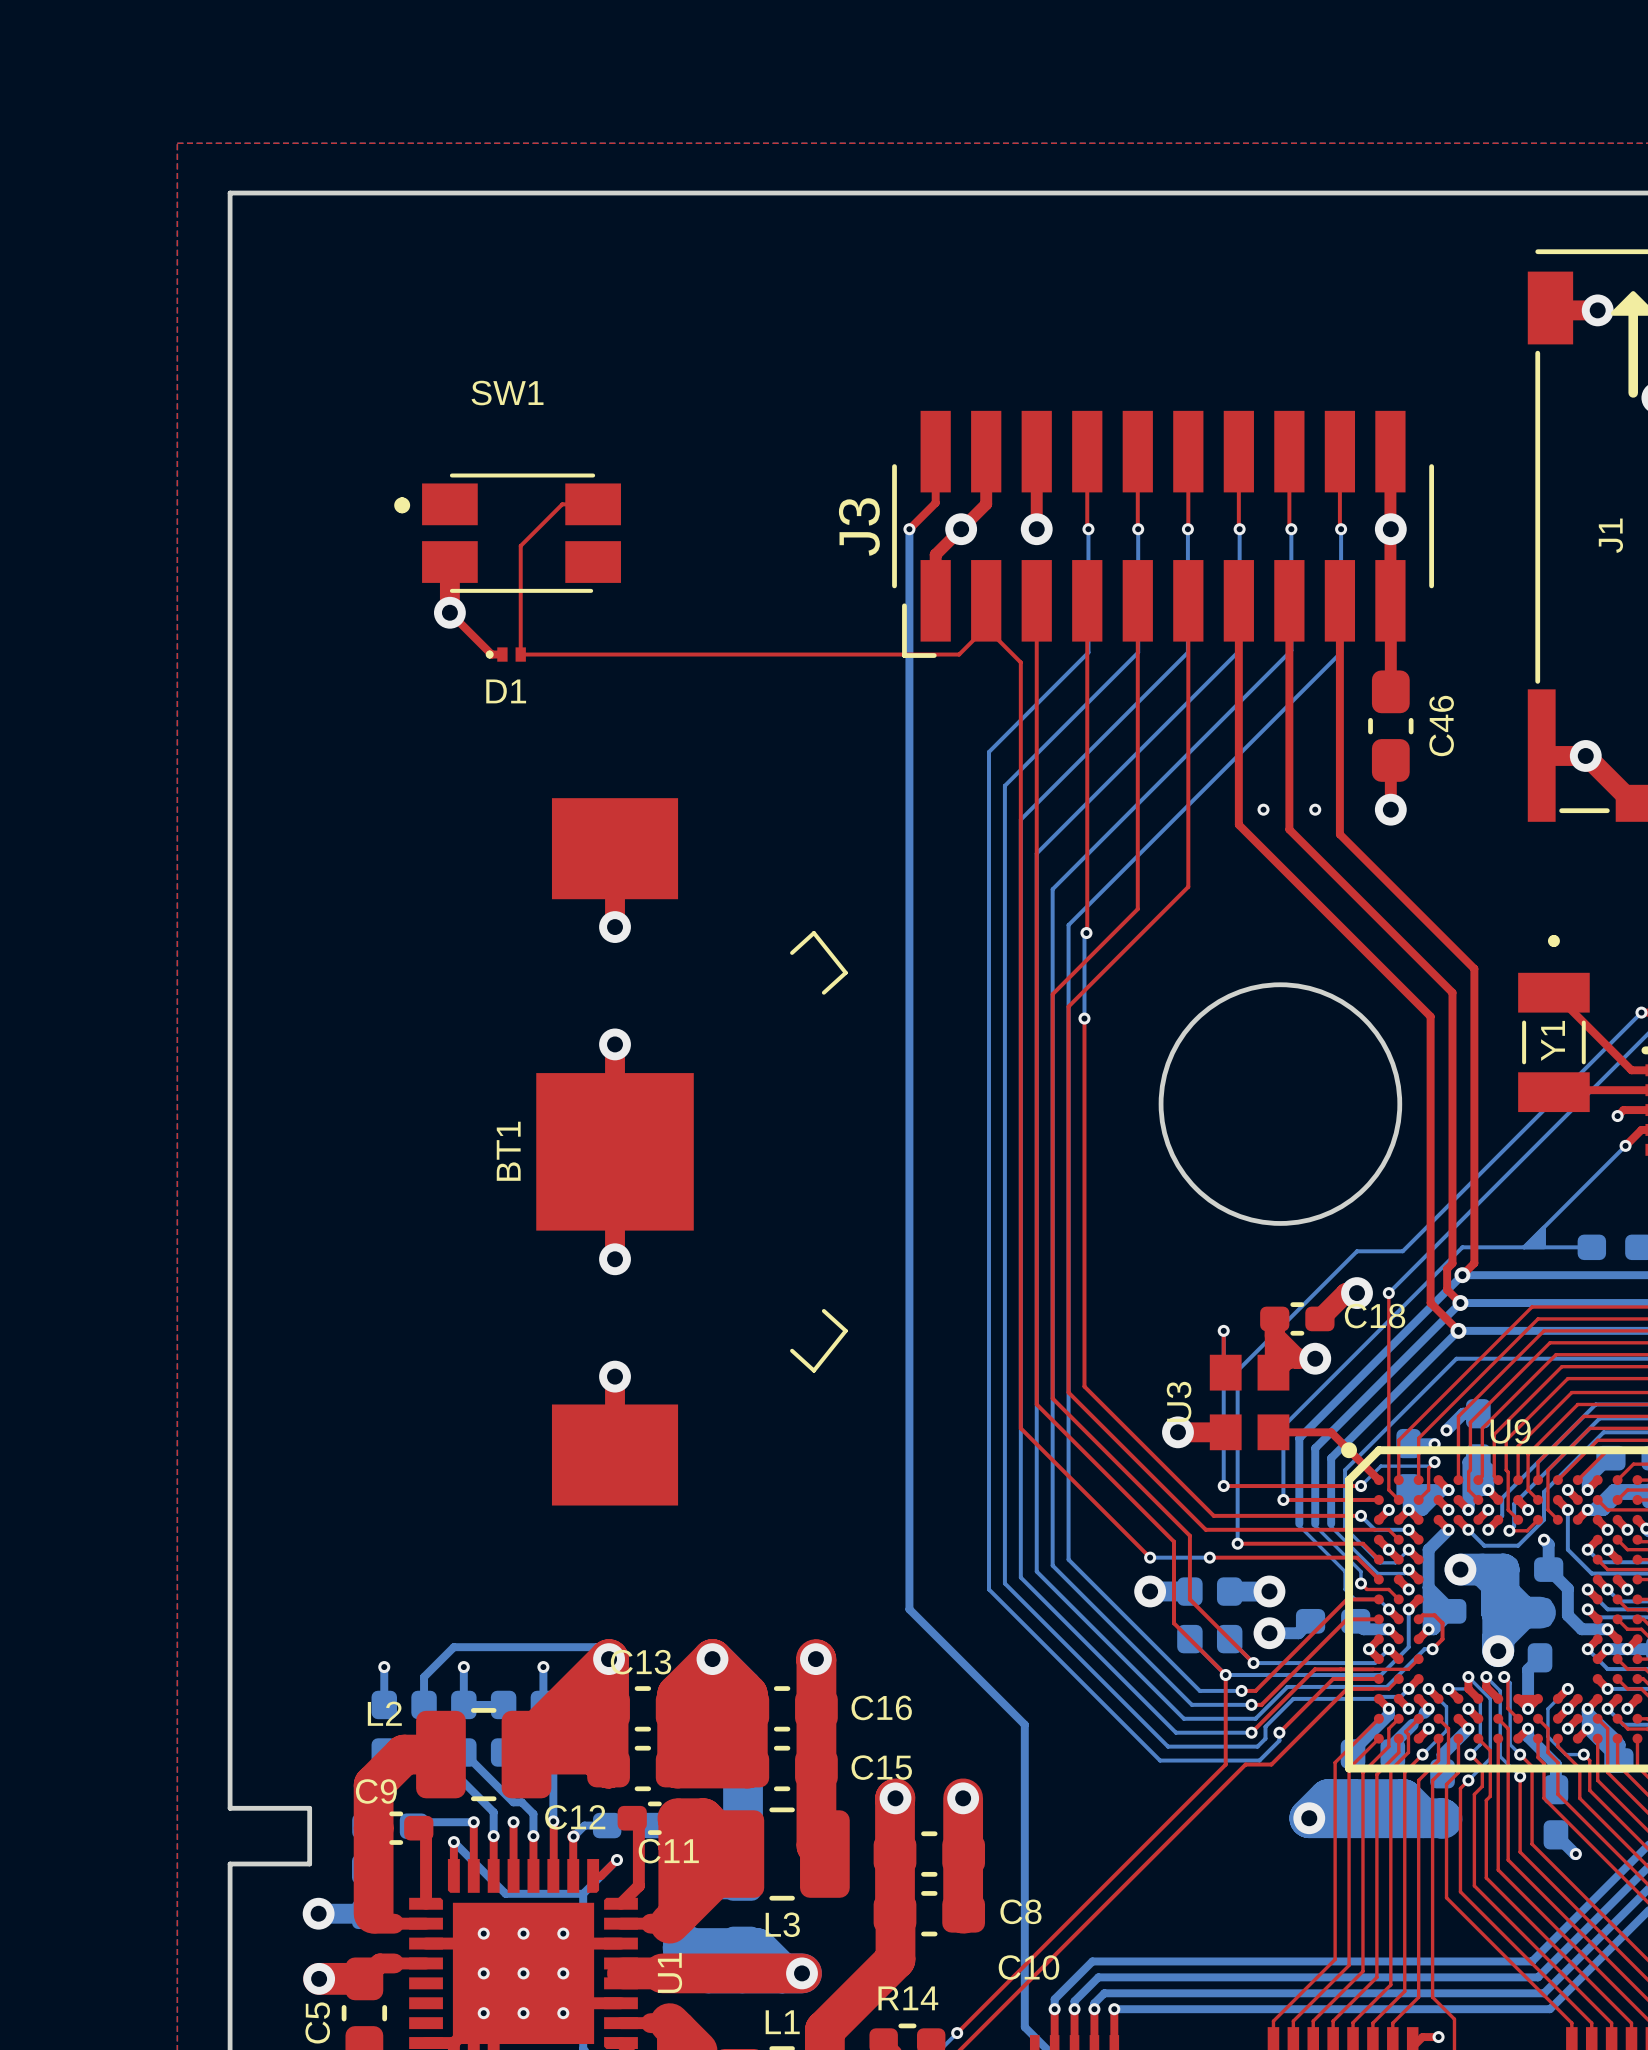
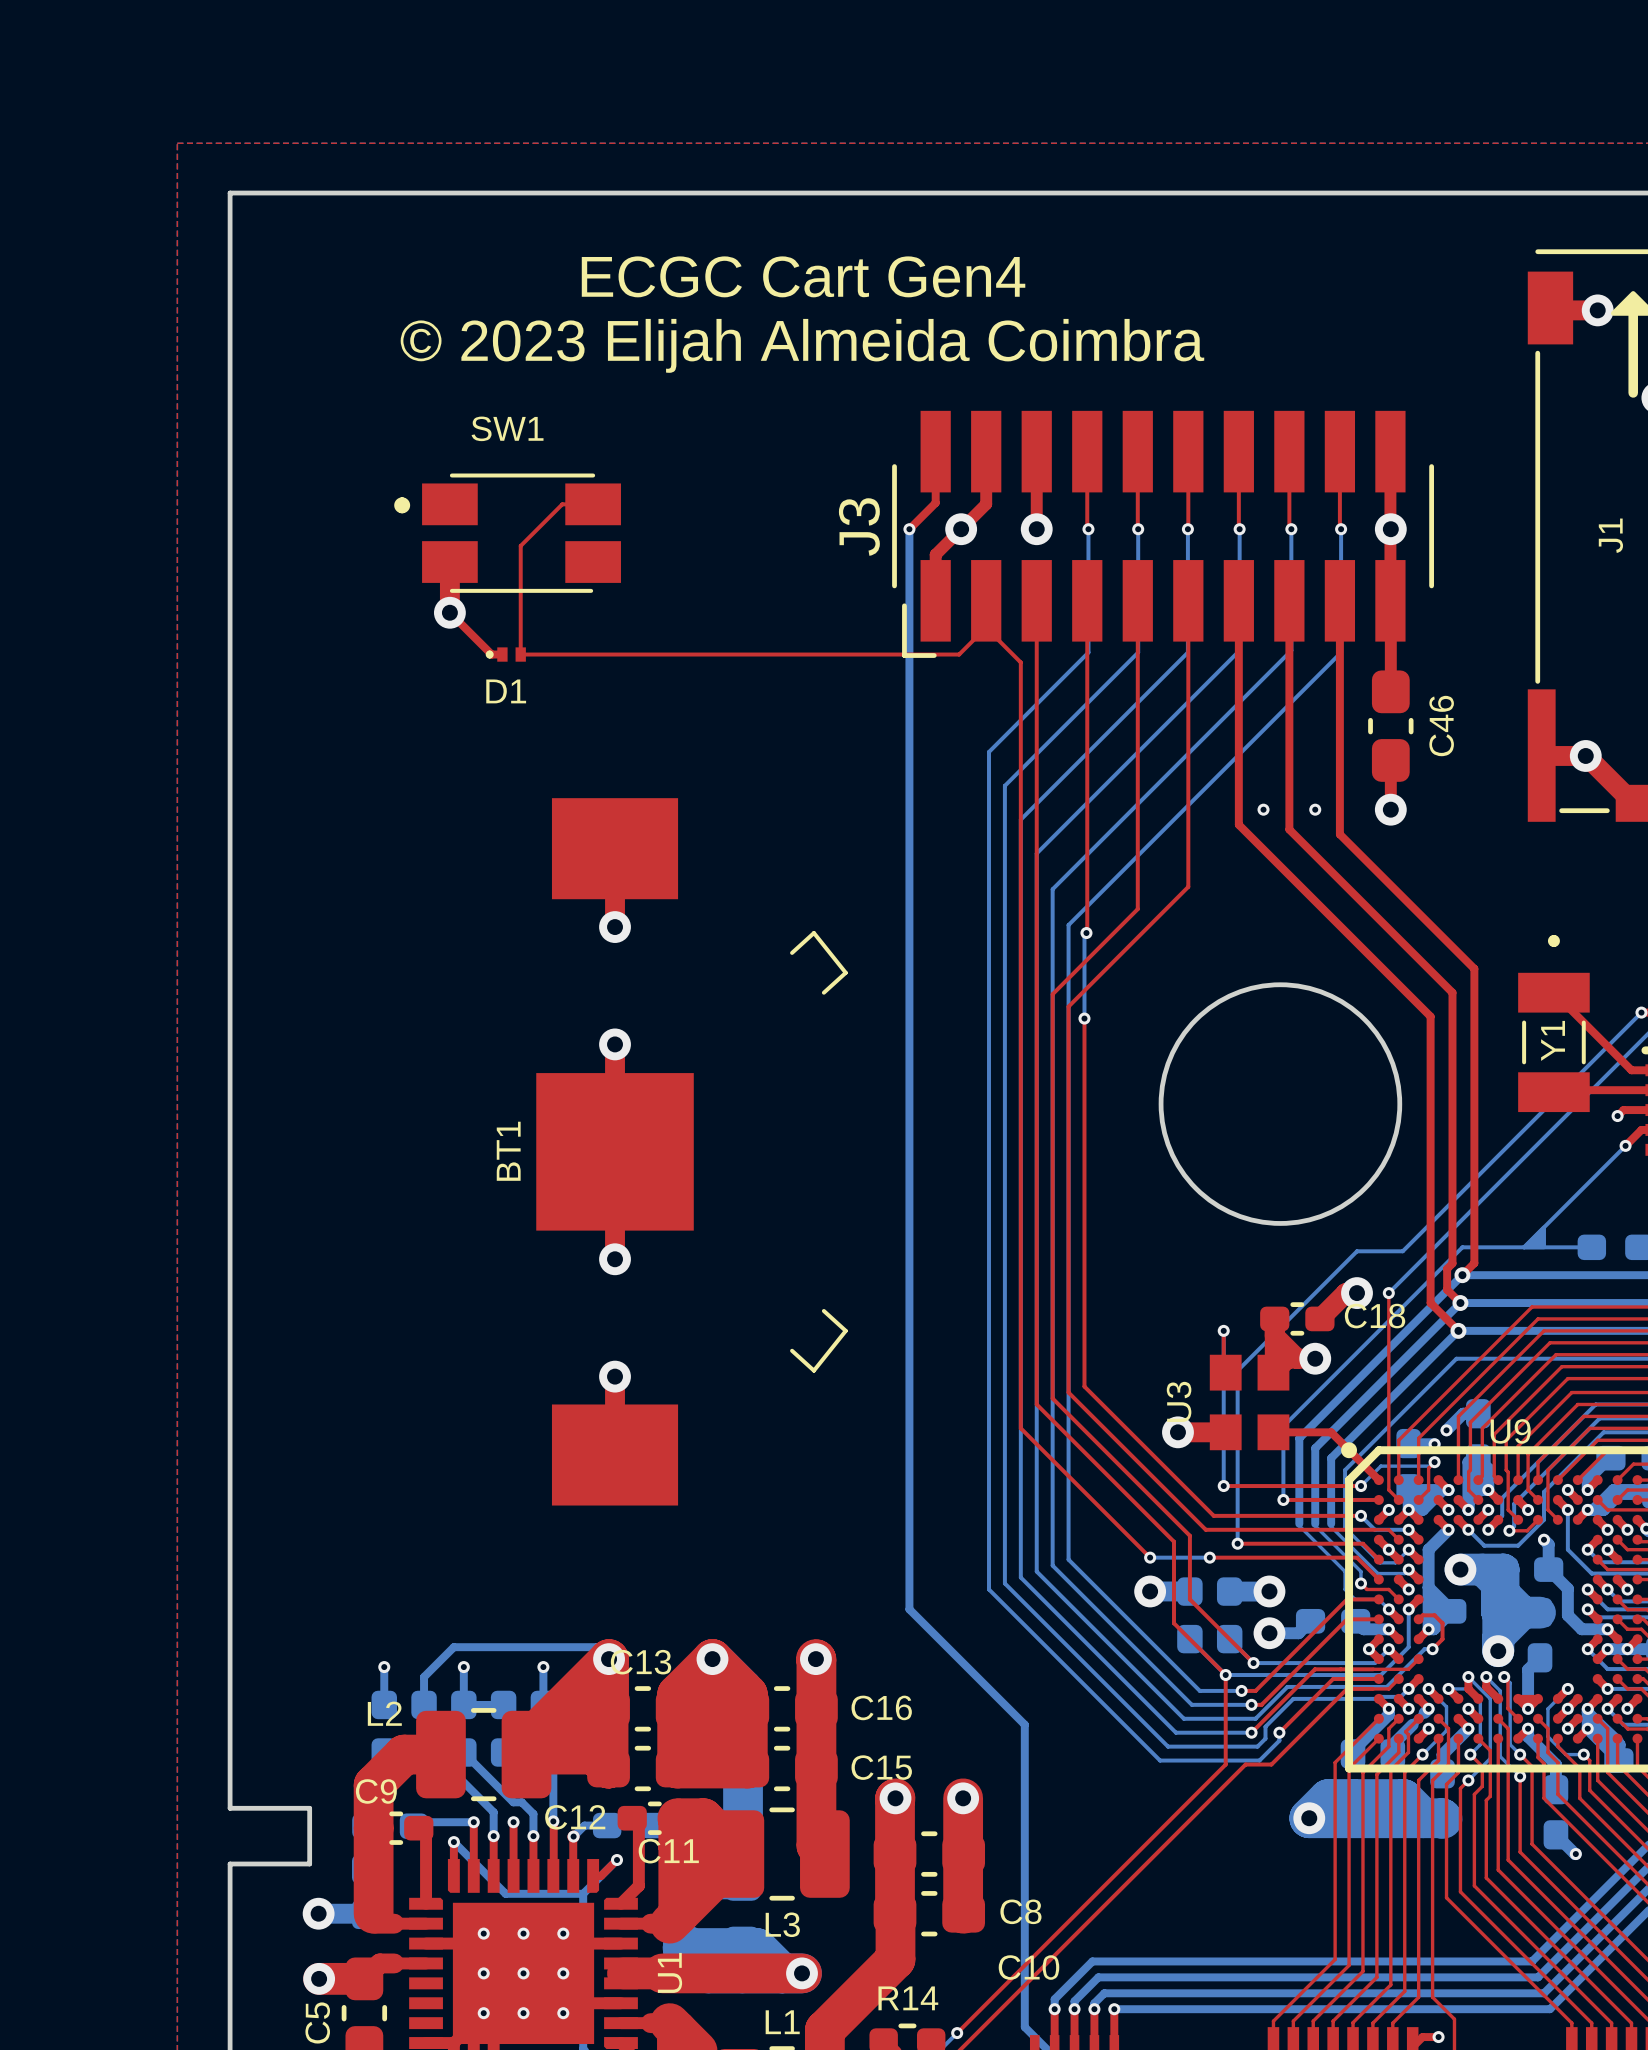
text: none -> ECGC Cart Gen4 (803, 276)
text: none -> © 2023 Elijah Almeida Coimbra (802, 345)
SW1 name position: SW1 (507, 393) -> SW1 (507, 428)

